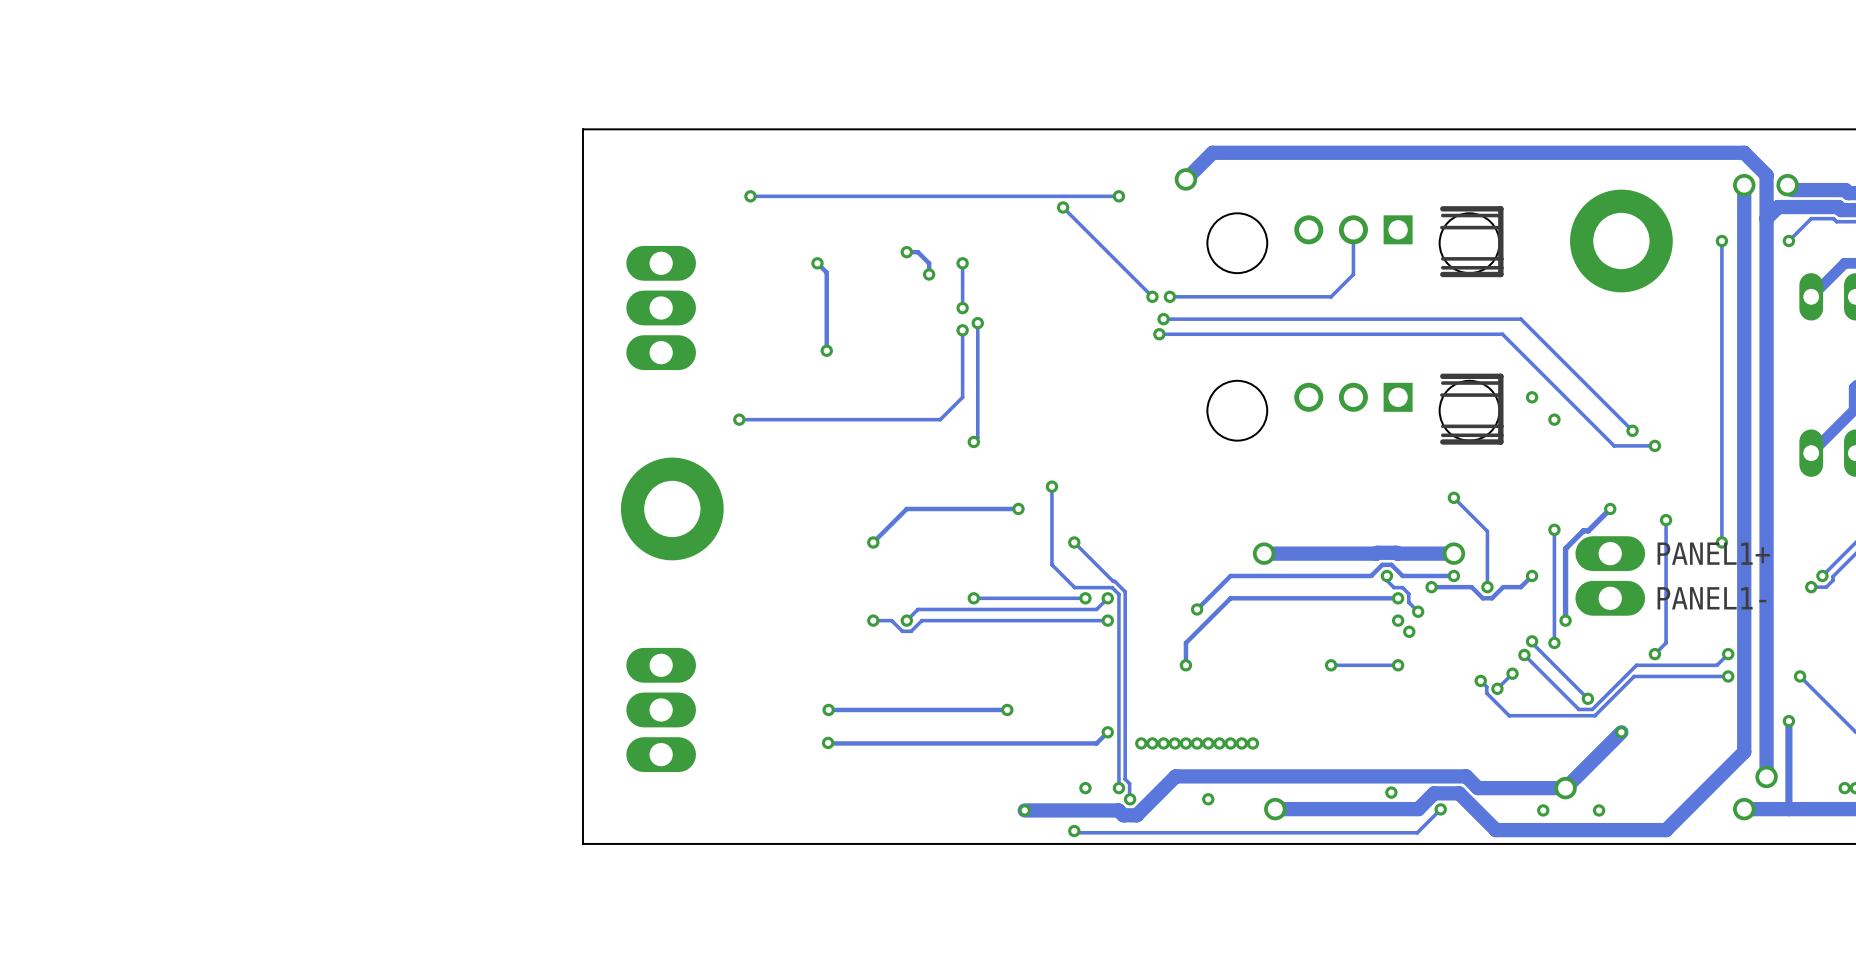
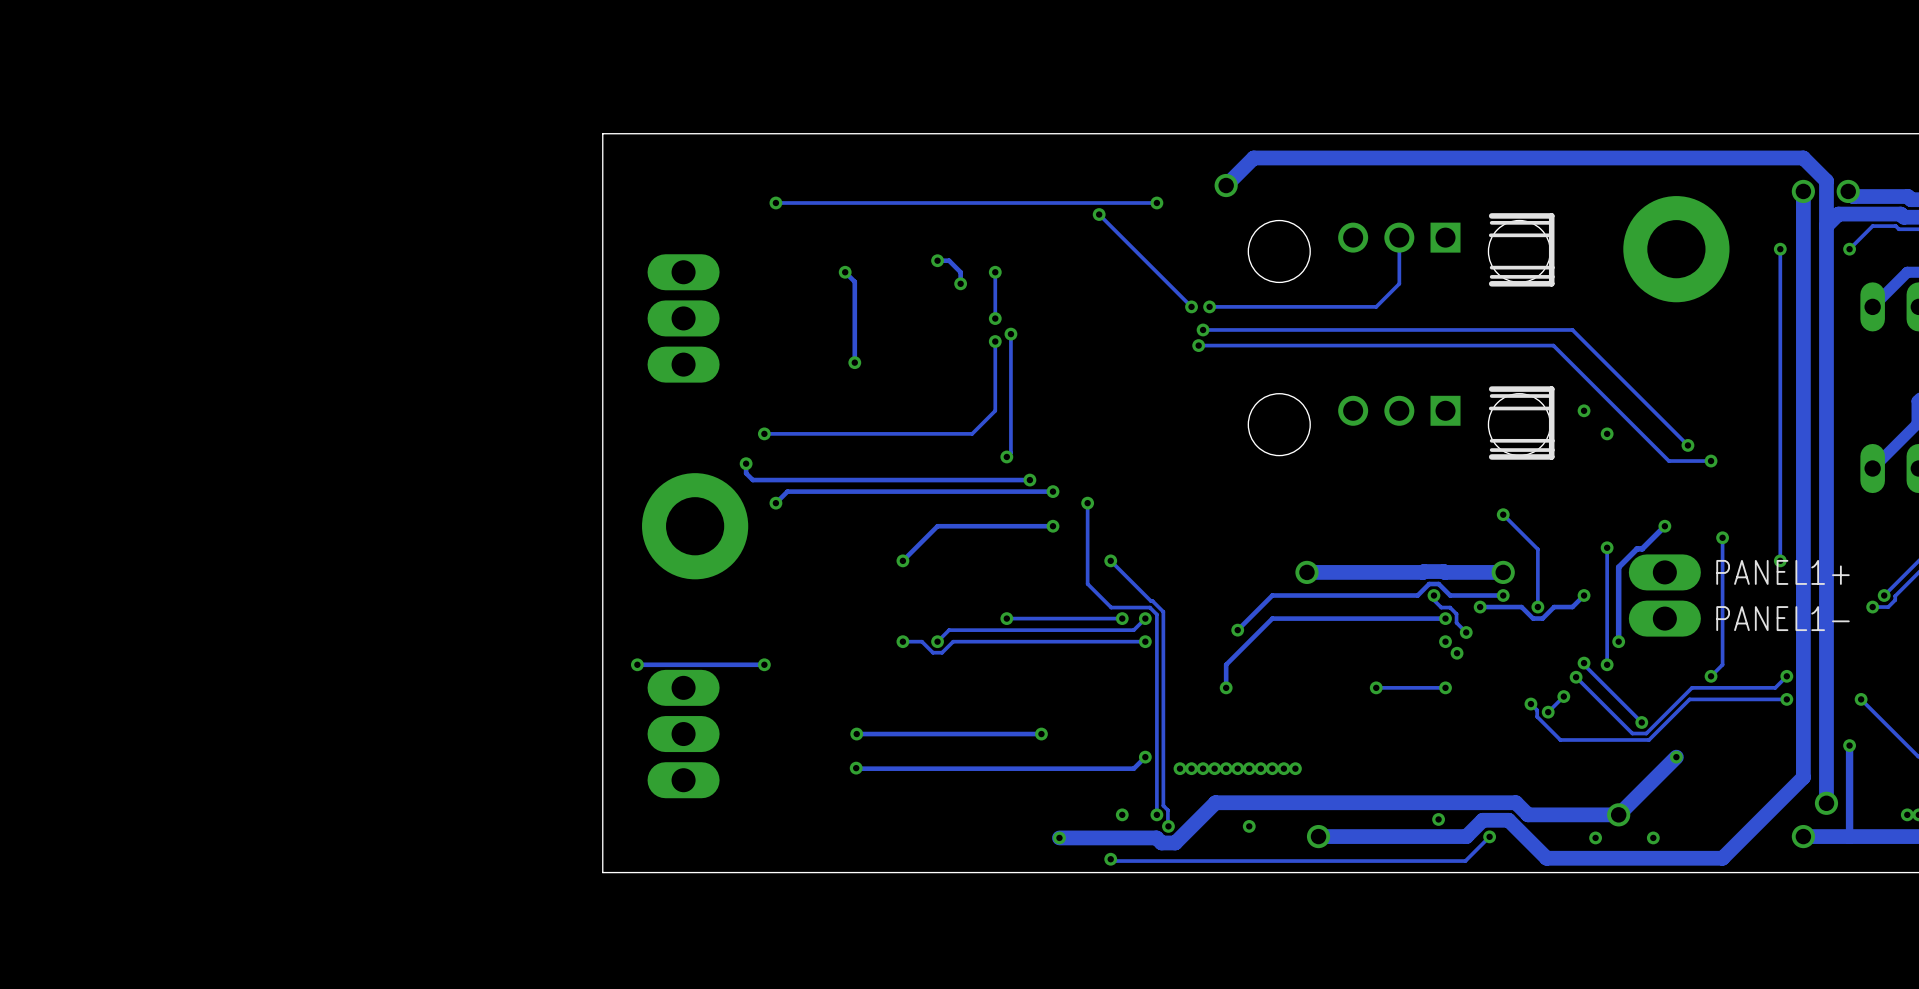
track: none -> (746, 463) (746, 473) (752, 480) (1029, 480)
via: none -> (746, 463)
via: none -> (1029, 480)
track: none -> (1053, 491) (787, 491) (775, 503)
via: none -> (1053, 491)
via: none -> (775, 503)
via: none -> (637, 664)
track: none -> (764, 664) (637, 664)
via: none -> (764, 664)

